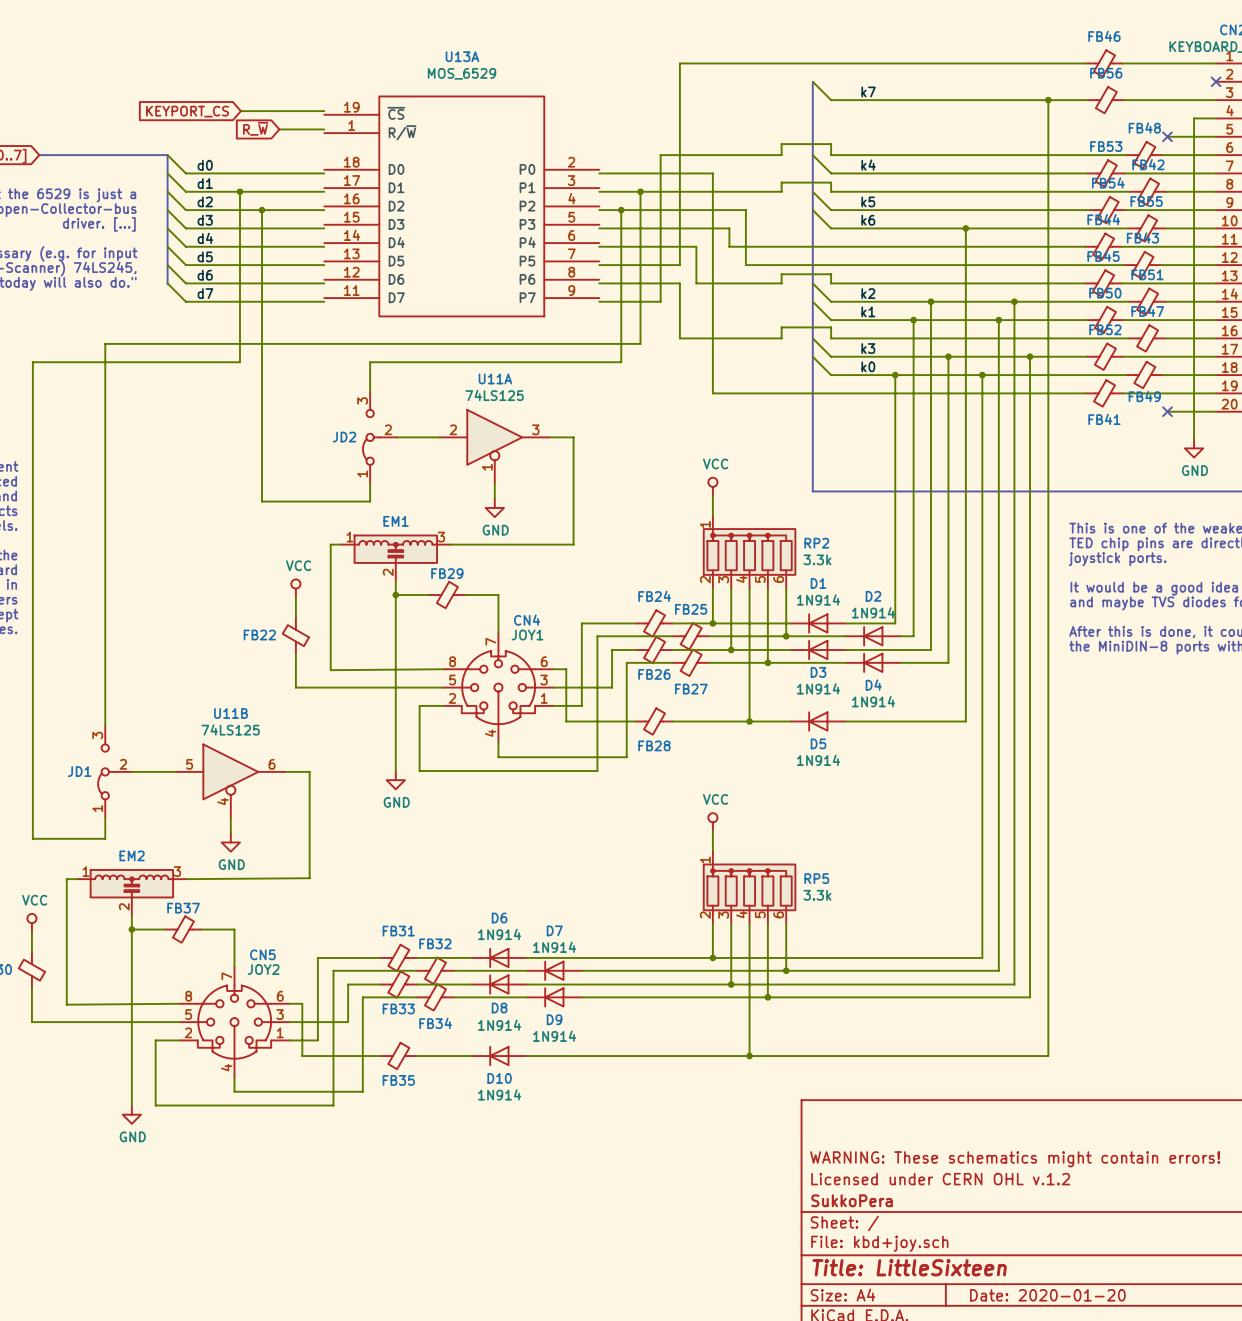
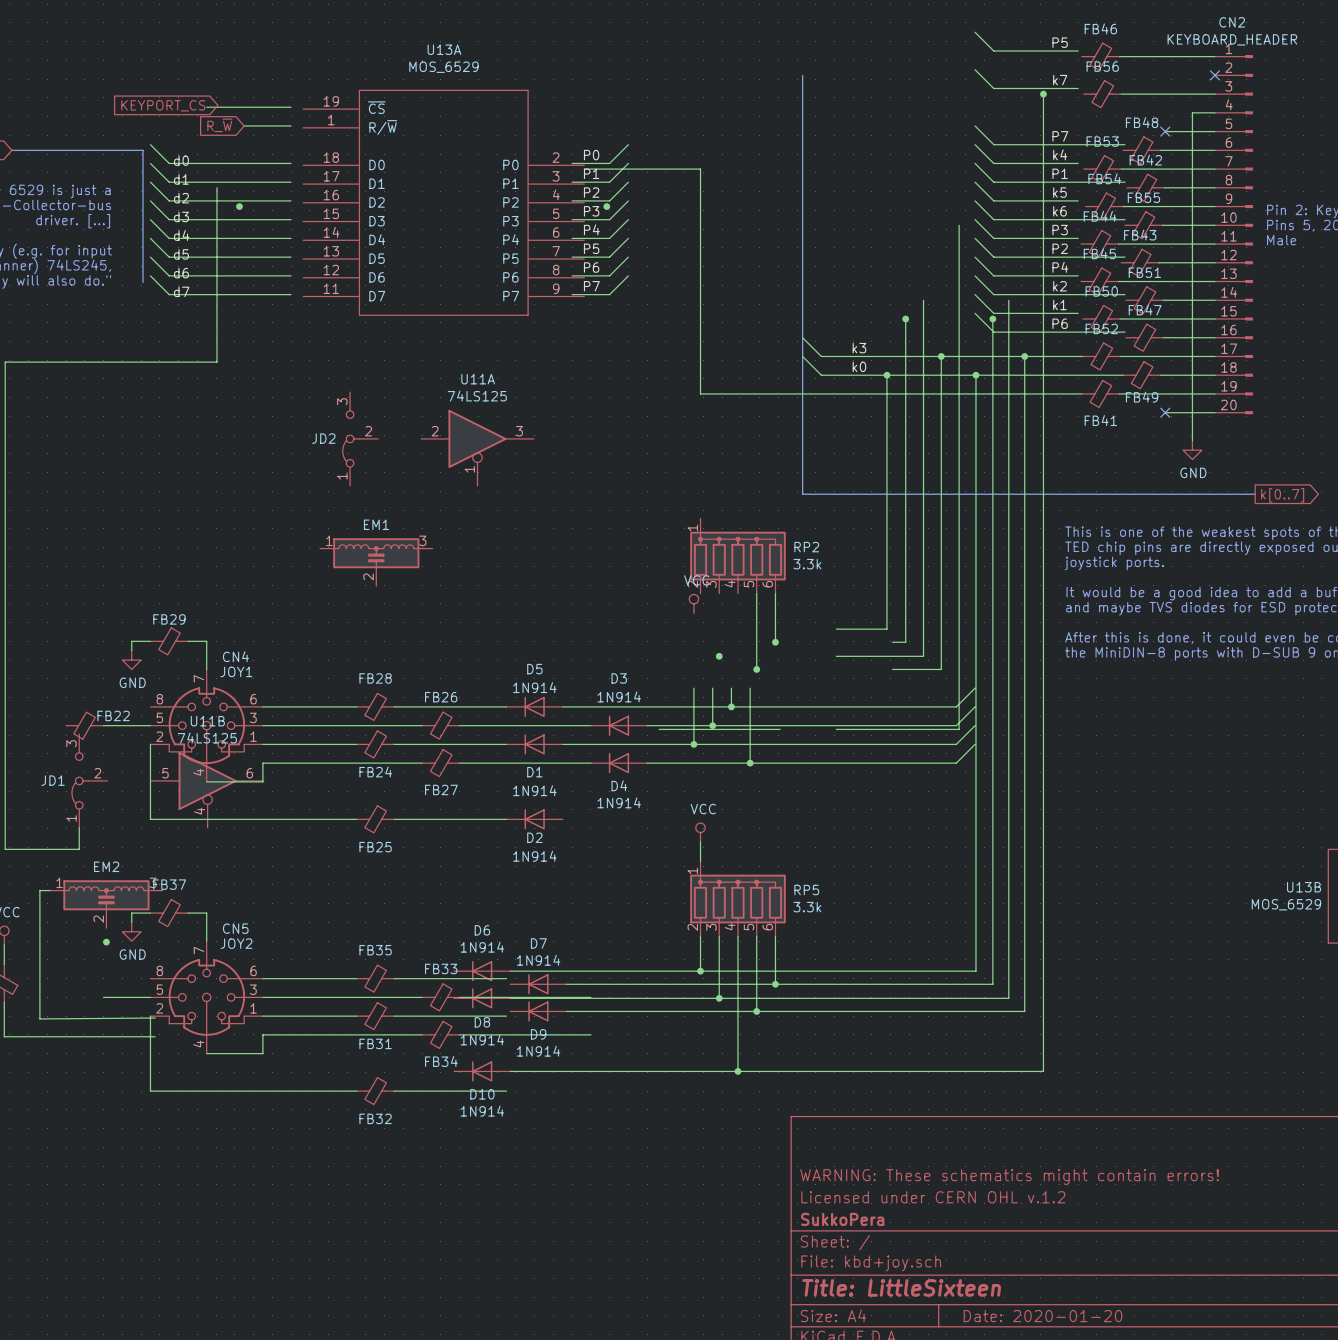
wire: none -> (975, 32) (993, 51) (1078, 51)
label: none -> P5 (1060, 42)
wire: (1085, 63) (679, 63) (679, 265) (599, 265) -> none
wire: none -> (975, 69) (993, 88) (1078, 88)
wire: (812, 81) (831, 100) (1087, 100) -> none
label: none -> k7 (1060, 80)
label: k7 (868, 91) -> none
wire: (240, 111) (324, 111) -> none
wire: none -> (206, 107) (291, 107)
global label position: R_~{W} (255, 128) -> R_~{W} (219, 125)
wire: (279, 129) (324, 129) -> none
wire: none -> (244, 125) (291, 125)
wire: none -> (975, 125) (993, 144) (1124, 144)
label: none -> P7 (1060, 136)
wire: none -> (150, 144) (169, 163) (291, 163)
wire: none -> (628, 144) (609, 163) (572, 163)
wire: none -> (975, 144) (993, 163) (1078, 163)
wire: (167, 155) (185, 173) (324, 173) -> none
wire: (812, 155) (831, 173) (1087, 173) -> none
wire: (1126, 155) (831, 155) (831, 144) (781, 144) (781, 155) (660, 155) (660, 301) (599, 301) -> none
label: none -> P0 (591, 155)
label: none -> k4 (1060, 154)
label: k4 (868, 165) -> none
wire: none -> (150, 163) (169, 182) (291, 182)
wire: none -> (628, 163) (609, 182) (572, 182)
wire: none -> (975, 163) (993, 182) (1124, 182)
wire: (167, 173) (185, 191) (324, 191) -> none
label: none -> P1 (591, 173)
label: none -> P1 (1060, 173)
wire: none -> (150, 182) (169, 200) (291, 200)
wire: none -> (628, 182) (609, 200) (572, 200)
wire: none -> (975, 182) (993, 200) (1078, 200)
wire: (167, 191) (185, 210) (324, 210) -> none
junction: (239, 191) -> none
wire: (599, 191) (781, 191) (781, 182) (831, 182) (831, 191) (1129, 191) -> none
wire: (640, 191) (640, 343) (105, 343) (105, 726) -> none
junction: (640, 191) -> none
wire: (812, 191) (831, 210) (1089, 210) -> none
label: none -> P2 (591, 192)
label: none -> k5 (1059, 192)
label: k5 (868, 201) -> none
wire: none -> (150, 200) (169, 219) (291, 219)
wire: none -> (628, 200) (609, 219) (572, 219)
wire: none -> (975, 200) (993, 219) (1124, 219)
wire: (167, 210) (185, 228) (324, 228) -> none
wire: (261, 210) (261, 501) (370, 501) (370, 483) -> none
wire: (599, 210) (745, 210) (745, 265) (1124, 265) -> none
wire: (621, 210) (621, 362) (370, 362) (370, 391) -> none
wire: (812, 210) (831, 228) (1128, 228) -> none
label: none -> P3 (591, 211)
label: none -> k6 (1059, 211)
label: k6 (868, 220) -> none
wire: none -> (150, 219) (169, 238) (291, 238)
wire: none -> (628, 219) (609, 238) (572, 238)
wire: none -> (975, 219) (993, 238) (1078, 238)
wire: (167, 228) (185, 246) (324, 246) -> none
wire: (599, 228) (729, 228) (729, 246) (1084, 246) -> none
junction: (965, 228) -> none
label: none -> P4 (591, 229)
label: none -> P3 (1060, 230)
wire: none -> (150, 238) (169, 257) (291, 257)
wire: none -> (628, 238) (609, 257) (572, 257)
wire: none -> (975, 238) (993, 257) (1124, 257)
wire: (167, 246) (185, 265) (324, 265) -> none
wire: (599, 246) (696, 246) (696, 283) (781, 283) (781, 274) (831, 274) (831, 283) (1084, 283) -> none
label: none -> P5 (591, 248)
label: none -> P2 (1060, 248)
wire: none -> (150, 257) (169, 275) (291, 275)
wire: none -> (628, 257) (609, 275) (572, 275)
wire: none -> (975, 257) (993, 275) (1078, 275)
wire: (167, 265) (185, 283) (324, 283) -> none
label: none -> P6 (591, 267)
label: none -> P4 (1060, 267)
wire: none -> (150, 275) (169, 294) (291, 294)
wire: none -> (628, 275) (609, 294) (572, 294)
wire: none -> (975, 275) (993, 294) (1124, 294)
wire: (167, 283) (185, 301) (324, 301) -> none
wire: (599, 283) (679, 283) (679, 338) (781, 338) (781, 327) (831, 327) (831, 338) (1128, 338) -> none
wire: (812, 283) (831, 301) (1128, 301) -> none
label: none -> P7 (591, 286)
label: none -> k2 (1059, 286)
label: k2 (868, 293) -> none
wire: none -> (975, 294) (993, 313) (1078, 313)
wire: (812, 301) (831, 320) (1086, 320) -> none
junction: (931, 301) -> none
junction: (1014, 301) -> none
label: none -> k1 (1059, 305)
label: k1 (868, 311) -> none
wire: none -> (975, 313) (993, 332) (1124, 332)
label: none -> P6 (1060, 323)
wire: (397, 437) (439, 437) -> none
wire: (549, 437) (573, 437) (573, 544) (450, 544) -> none
wire: (494, 483) (494, 498) -> none
power symbol position: VCC (712, 486) -> VCC (693, 603)
wire: (712, 496) (712, 515) -> none
power symbol: GND (494, 507) -> none
wire: (340, 544) (330, 544) (330, 670) (443, 669) -> none
wire: (395, 581) (395, 770) -> none
D1 name position: D1 (818, 583) -> D1 (534, 772)
power symbol: VCC (295, 588) -> none
wire: (712, 588) (712, 623) -> none
wire: (731, 588) (731, 650) -> none
wire: (749, 588) (749, 721) -> none
wire: (395, 595) (428, 595) -> none
junction: (395, 595) -> none
FB29 position: (447, 595) -> (169, 641)
wire: (465, 595) (498, 595) (498, 632) -> none
FB24 name position: FB24 (654, 596) -> FB24 (375, 771)
D2 name position: D2 (873, 596) -> D2 (534, 837)
wire: (295, 597) (295, 617) -> none
D1 value position: 1N914 (818, 599) -> 1N914 (534, 790)
FB25 name position: FB25 (691, 609) -> FB25 (375, 847)
D2 value position: 1N914 (873, 612) -> 1N914 (534, 856)
wire: (635, 623) (581, 623) (581, 705) (553, 705) -> none
FB24 position: (654, 623) -> (375, 744)
wire: (672, 623) (790, 623) -> none
junction: (712, 623) -> none
D1 position: (818, 623) -> (534, 744)
wire: none -> (150, 641) (131, 641) (131, 650)
wire: none -> (187, 641) (206, 641) (206, 669)
FB22 name position: FB22 (259, 635) -> FB22 (113, 715)
FB22 rotation: 0° (295, 635) -> 90° clockwise (84, 725)
FB22 position: (295, 635) -> (84, 725)
wire: (672, 636) (597, 636) (597, 770) (419, 770) (419, 705) (443, 705) -> none
FB25 position: (690, 636) -> (375, 819)
wire: (709, 636) (845, 636) -> none
D2 position: (873, 636) -> (534, 819)
wire: (635, 650) (612, 650) (612, 687) (553, 687) -> none
FB26 position: (654, 650) -> (440, 725)
wire: (672, 650) (790, 650) -> none
D3 position: (818, 650) -> (618, 725)
power symbol: none -> GND (131, 660)
wire: (295, 653) (295, 687) (443, 687) -> none
wire: (672, 662) (626, 662) (626, 757) (498, 757) (498, 742) -> none
FB27 position: (690, 662) -> (440, 763)
wire: (709, 662) (845, 662) -> none
D4 position: (873, 662) -> (618, 763)
wire: (553, 669) (566, 669) (566, 721) (635, 721) -> none
D3 name position: D3 (818, 672) -> D3 (619, 678)
FB26 name position: FB26 (654, 674) -> FB26 (441, 697)
wire: none -> (693, 688) (693, 744)
wire: none -> (712, 688) (712, 725)
wire: none -> (731, 688) (731, 706)
wire: none -> (750, 688) (750, 763)
wire: none -> (975, 688) (956, 706) (562, 706)
CN4 position: (498, 687) -> (206, 725)
D3 value position: 1N914 (818, 688) -> 1N914 (619, 696)
wire: none -> (262, 706) (356, 706)
wire: none -> (394, 706) (506, 706)
junction: none -> (731, 706)
wire: none -> (975, 706) (956, 725) (647, 725)
wire: none -> (103, 725) (150, 725)
wire: none -> (262, 725) (422, 725)
wire: none -> (459, 725) (590, 725)
junction: none -> (712, 725)
wire: none -> (975, 725) (956, 744) (562, 744)
FB28 position: (654, 721) -> (375, 706)
junction: (749, 721) -> none
D5 position: (818, 721) -> (534, 706)
wire: none -> (150, 744) (150, 819) (356, 819)
wire: none -> (262, 744) (356, 744)
wire: none -> (394, 744) (506, 744)
junction: none -> (693, 744)
wire: none -> (975, 744) (956, 763) (647, 763)
D5 name position: D5 (818, 743) -> D5 (534, 669)
FB28 name position: FB28 (654, 745) -> FB28 (375, 678)
wire: none -> (422, 763) (262, 763) (262, 781) (206, 781)
wire: none -> (459, 763) (590, 763)
junction: none -> (750, 763)
D5 value position: 1N914 (818, 760) -> 1N914 (534, 687)
wire: (132, 771) (175, 771) -> none
wire: (285, 771) (309, 771) (309, 878) (186, 879) -> none
power symbol: GND (395, 780) -> none
wire: none -> (394, 819) (506, 819)
wire: (230, 817) (230, 833) -> none
power symbol: GND (230, 842) -> none
wire: none -> (150, 913) (131, 913) (131, 922)
wire: none -> (187, 913) (206, 913) (206, 941)
FB37 name position: FB37 (183, 908) -> FB37 (169, 884)
wire: (131, 915) (131, 1105) -> none
power symbol: none -> GND (131, 931)
wire: (131, 929) (164, 929) -> none
FB37 position: (183, 929) -> (169, 913)
wire: (201, 929) (234, 929) (234, 967) -> none
FB31 name position: FB31 (398, 931) -> FB31 (375, 1043)
FB32 name position: FB32 (435, 943) -> FB32 (375, 1118)
wire: (380, 957) (317, 957) (317, 1040) (289, 1040) -> none
FB31 position: (398, 957) -> (375, 1016)
wire: (416, 957) (471, 957) -> none
wire: none -> (262, 978) (356, 978)
wire: none -> (394, 978) (506, 978)
wire: (416, 970) (333, 970) (333, 1105) (155, 1105) (155, 1040) (179, 1040) -> none
FB32 position: (435, 970) -> (375, 1091)
wire: (453, 970) (526, 970) -> none
wire: none -> (103, 997) (150, 997)
wire: none -> (262, 997) (422, 997)
wire: none -> (459, 997) (590, 997)
wire: (380, 984) (348, 984) (348, 1022) (289, 1022) -> none
FB33 position: (398, 984) -> (440, 997)
wire: (416, 984) (471, 984) -> none
wire: (416, 997) (362, 997) (362, 1091) (234, 1091) (234, 1077) -> none
FB34 position: (435, 997) -> (440, 1034)
wire: (453, 997) (526, 997) -> none
wire: none -> (150, 1016) (150, 1091) (356, 1091)
wire: none -> (262, 1016) (356, 1016)
wire: none -> (394, 1016) (506, 1016)
wire: (289, 1003) (302, 1003) (302, 1056) (380, 1056) -> none
FB33 name position: FB33 (398, 1008) -> FB33 (441, 968)
wire: none -> (422, 1034) (262, 1034) (262, 1053) (206, 1053)
wire: none -> (459, 1034) (590, 1034)
CN5 position: (234, 1022) -> (206, 997)
FB35 position: (398, 1056) -> (375, 978)
wire: (416, 1056) (471, 1056) -> none
wire: none -> (394, 1091) (506, 1091)
FB35 name position: FB35 (398, 1080) -> FB35 (375, 950)
power symbol: GND (131, 1114) -> none

